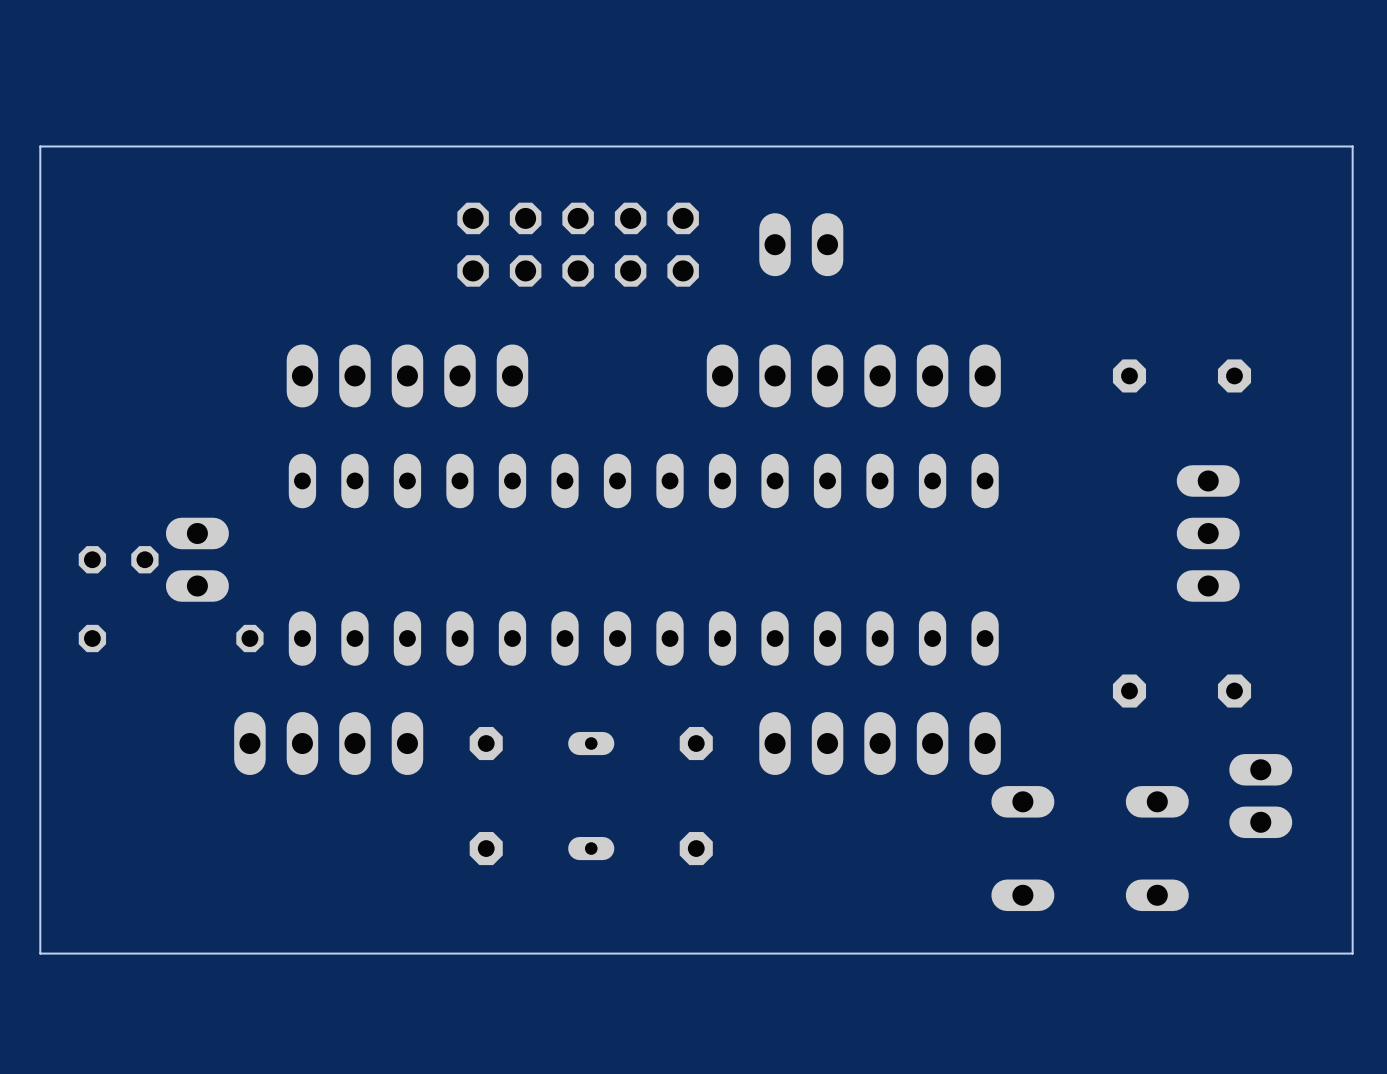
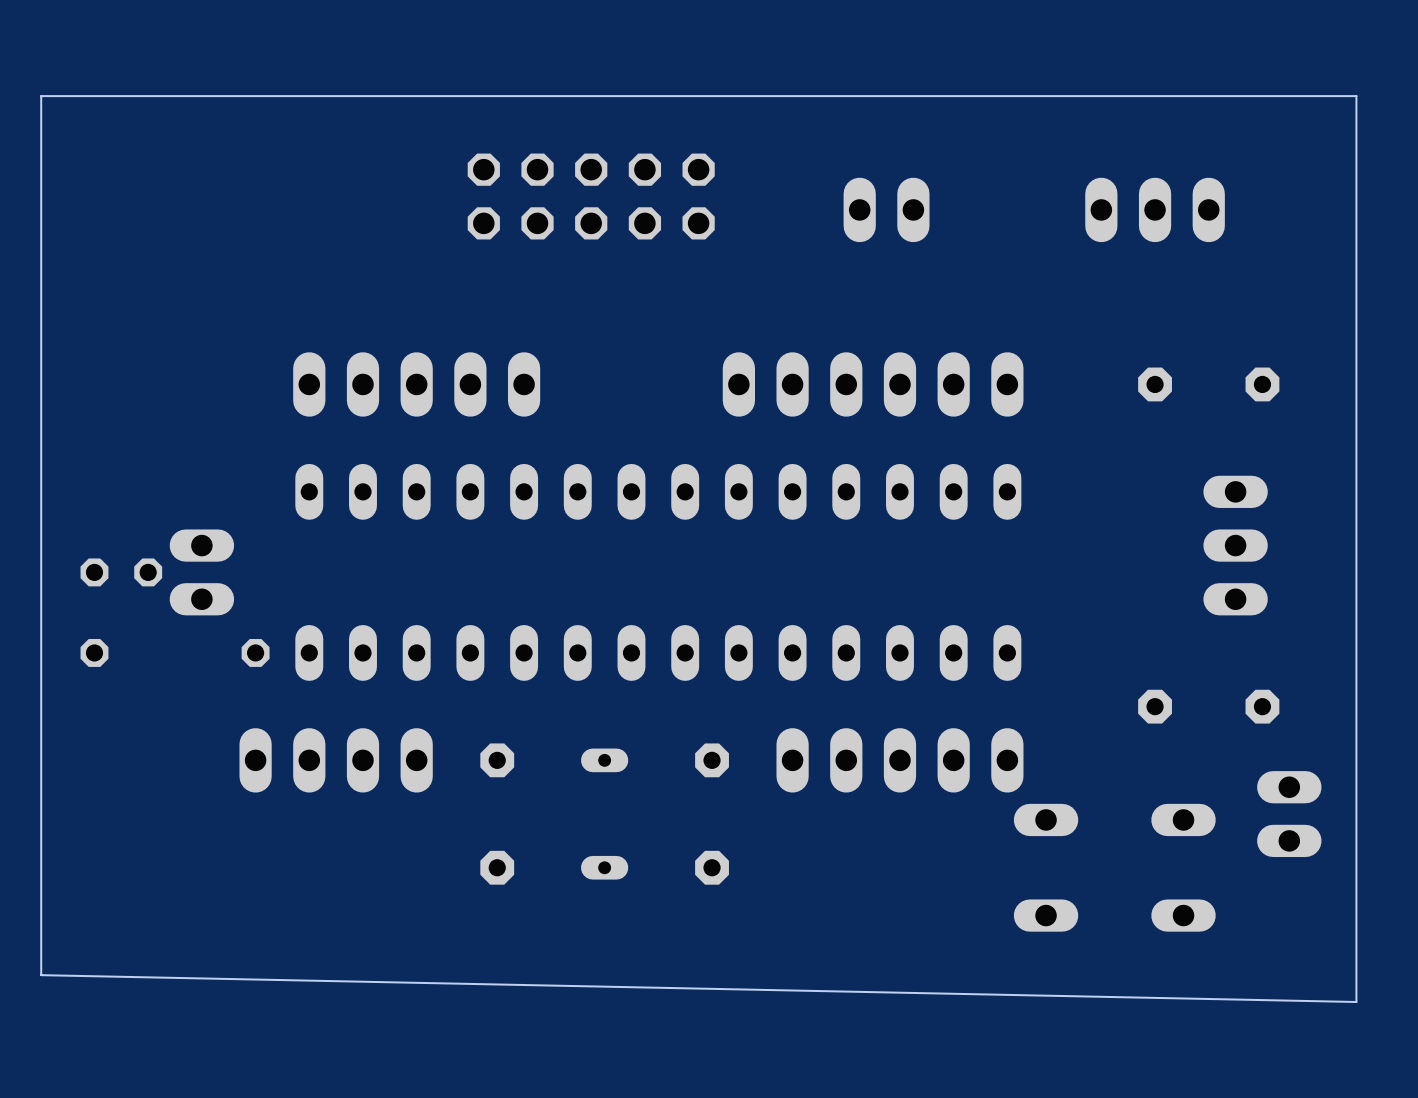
board edge: (40, 146) (1352, 146) (1352, 953) (40, 953) -> (41, 149) (41, 96) (1356, 96) (1356, 1002) (41, 975)
part: none -> (1155, 209)
part position: (578, 244) -> (591, 196)
part position: (801, 244) -> (886, 209)

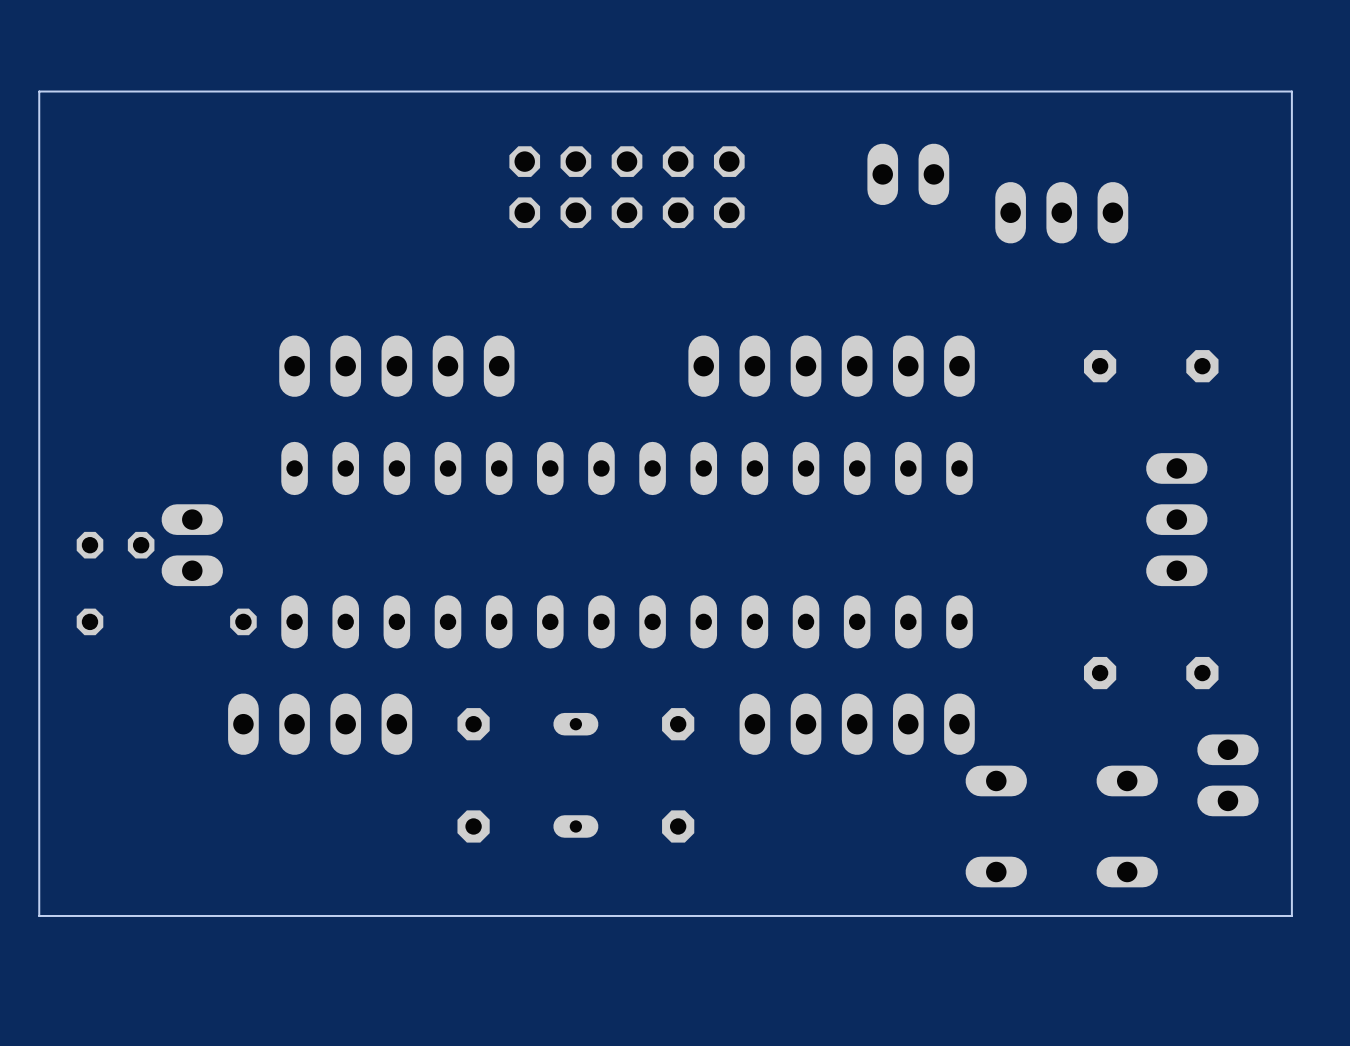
part position: (591, 196) -> (627, 187)
part position: (886, 209) -> (908, 174)
part position: (1155, 209) -> (1061, 212)
board edge: (1356, 961) (1356, 1002) (41, 975) (41, 961) -> (1291, 915) (39, 915)

